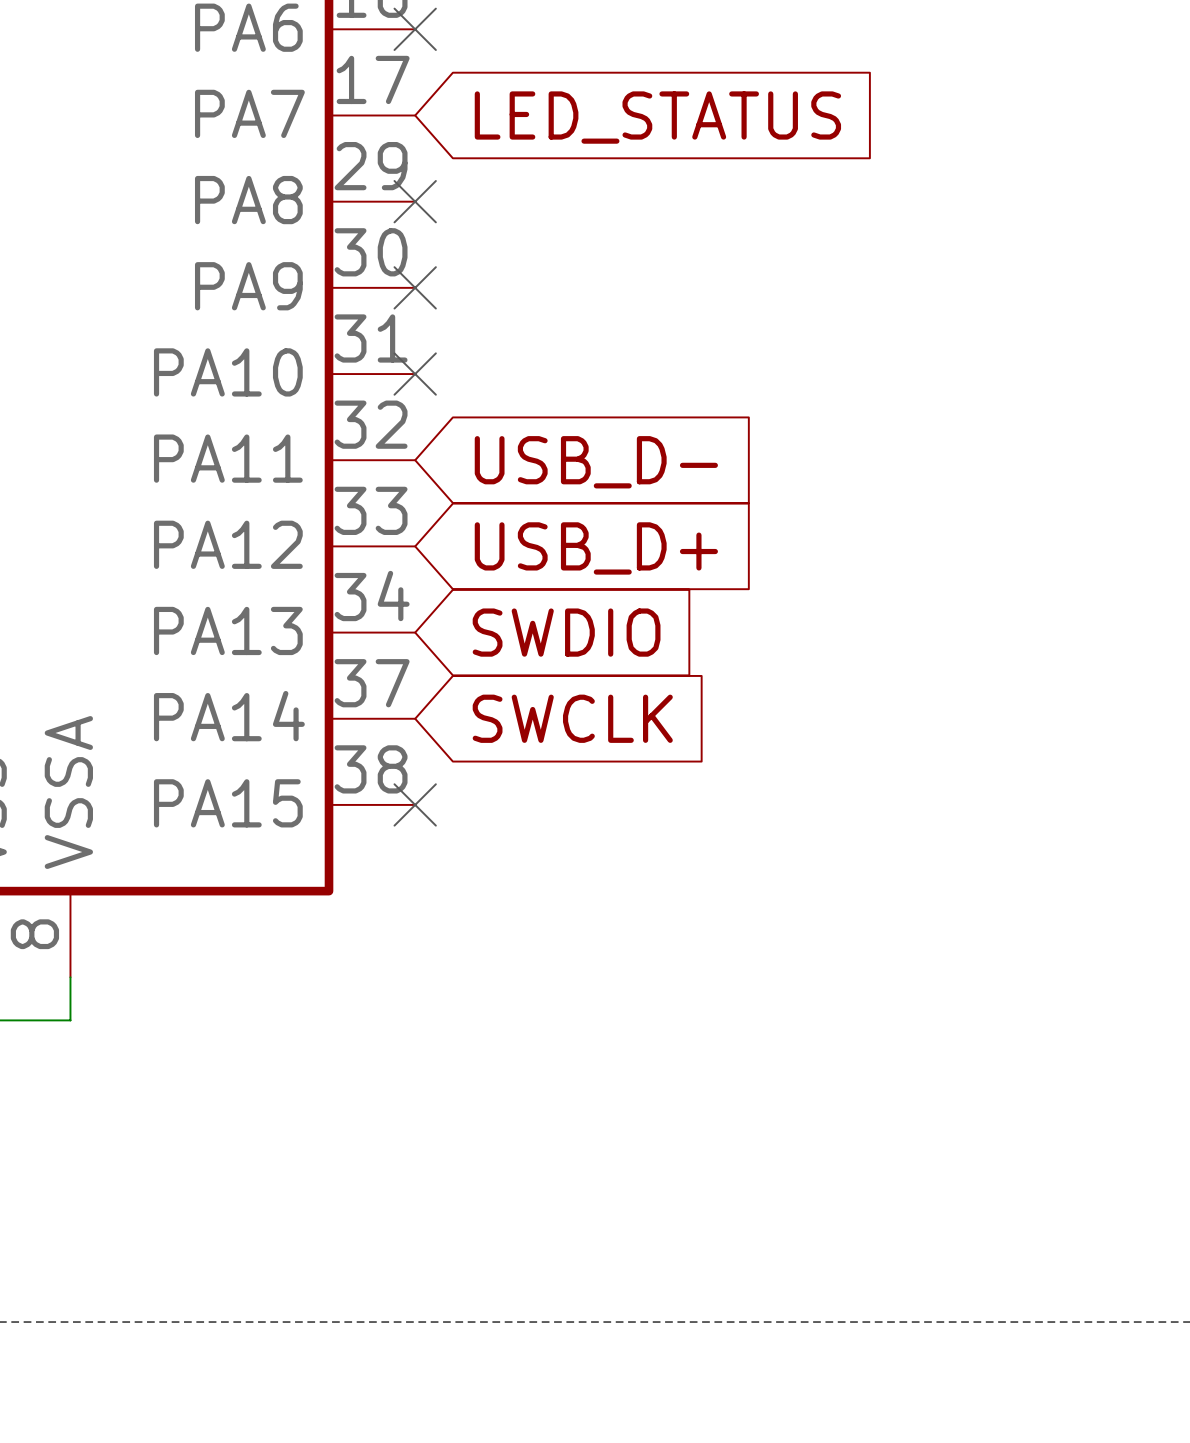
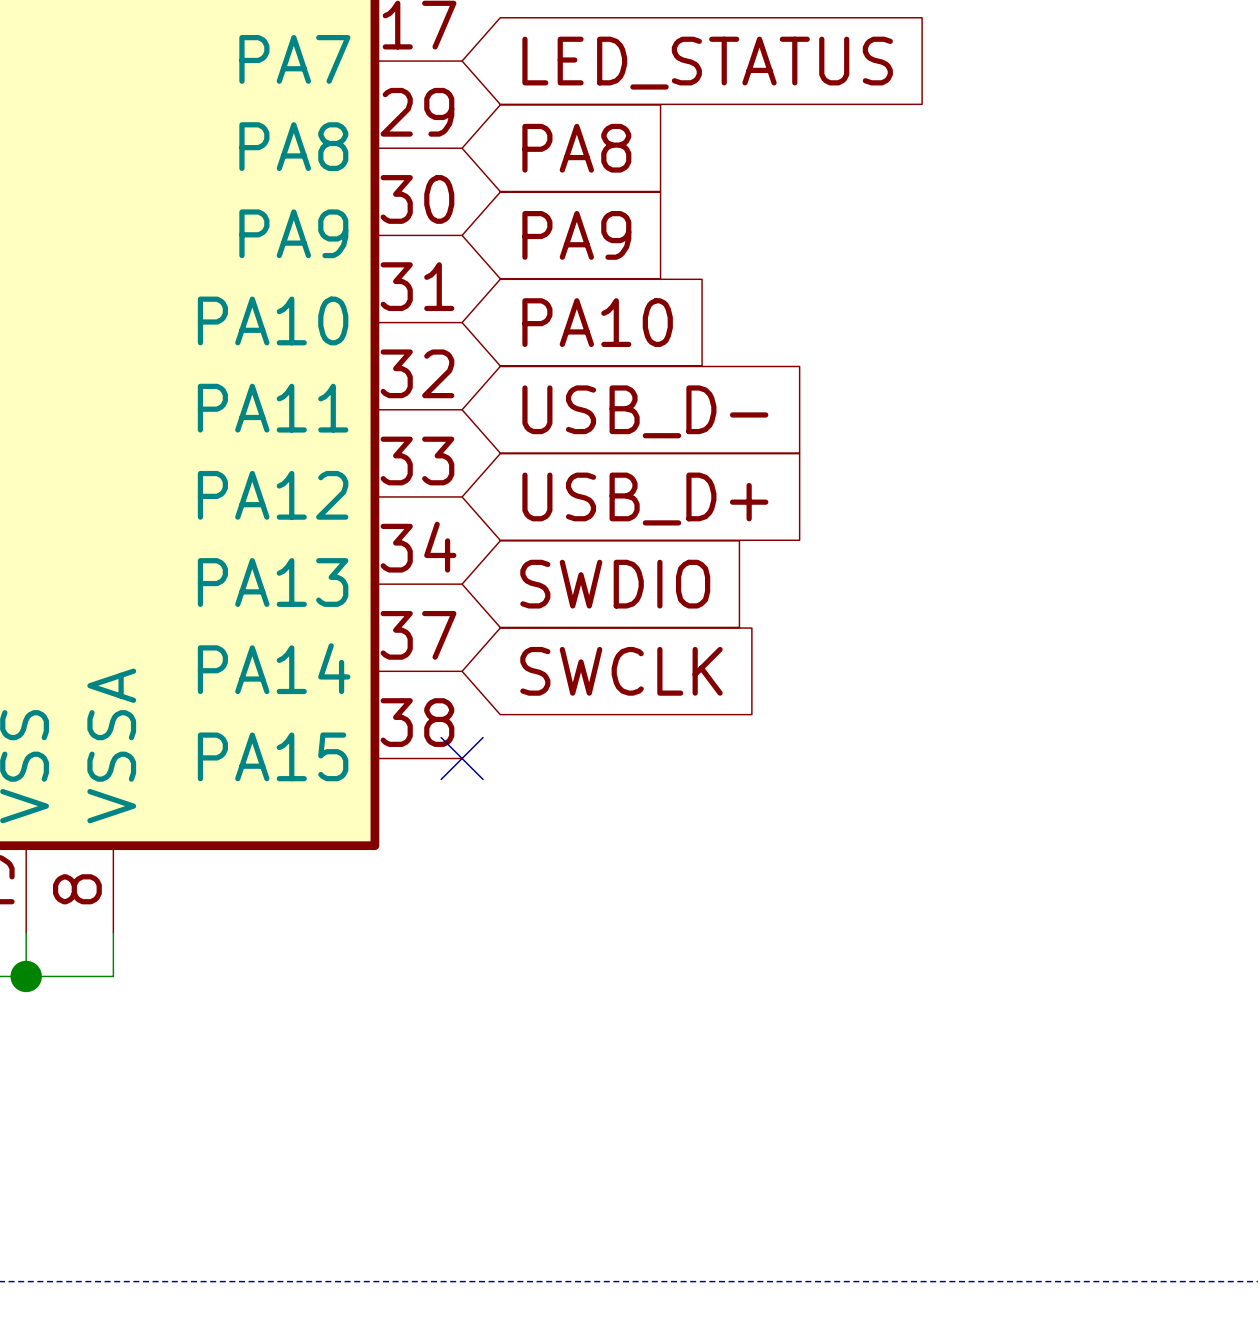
no-connect mark: (415, 201) -> none
global label: none -> PA8 (576, 148)
no-connect mark: (415, 287) -> none
global label: none -> PA9 (576, 235)
no-connect mark: (415, 374) -> none
global label: none -> PA10 (597, 322)

